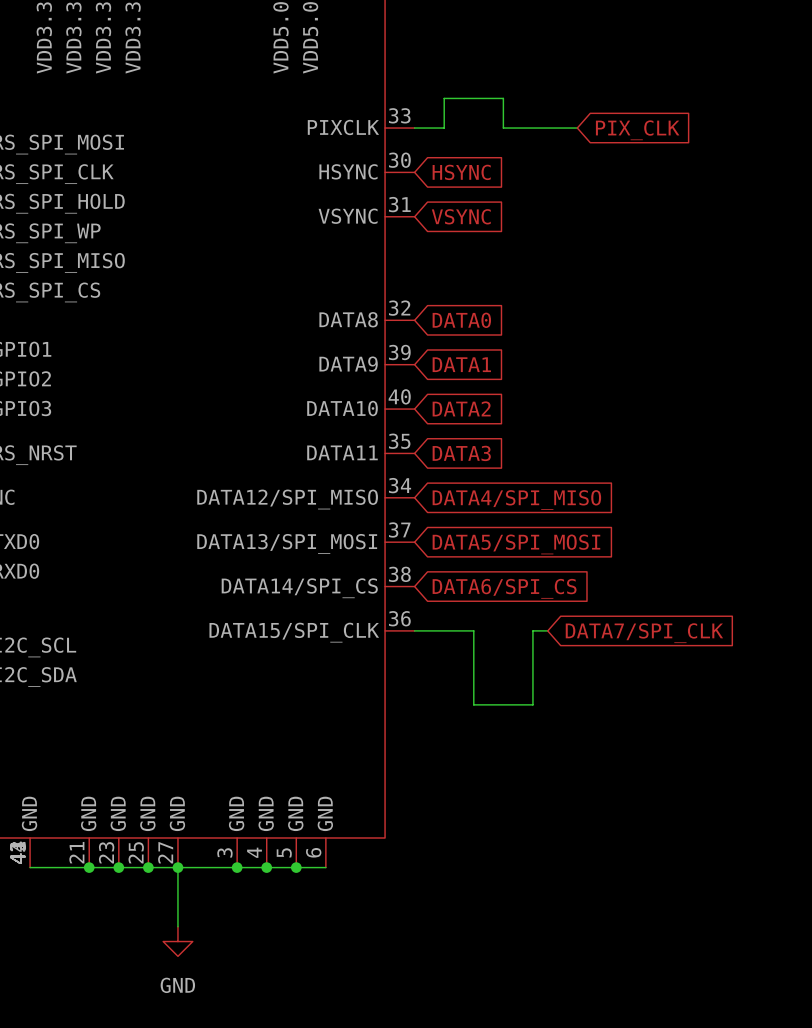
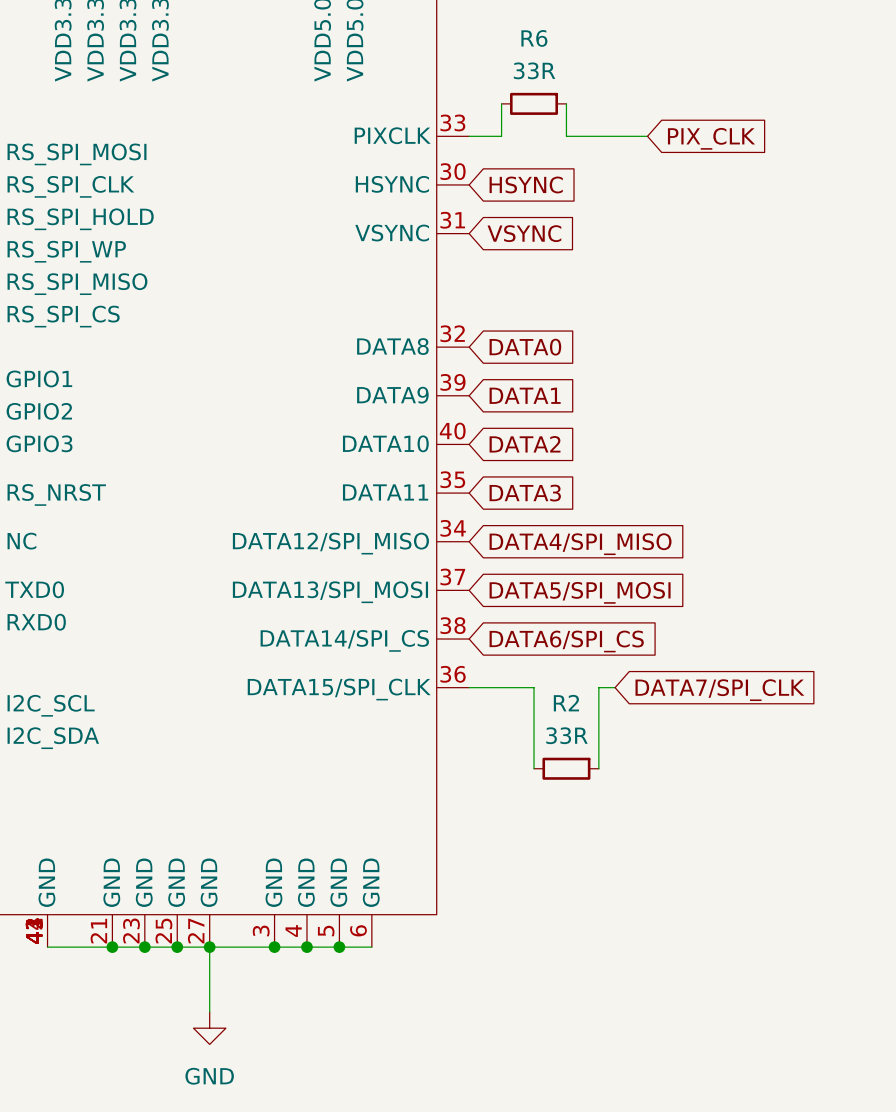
wire: (444, 98) (503, 98) -> none
R6: none -> 33R (534, 103)
wire: (473, 704) (532, 704) -> none
R2: none -> 33R (566, 768)

